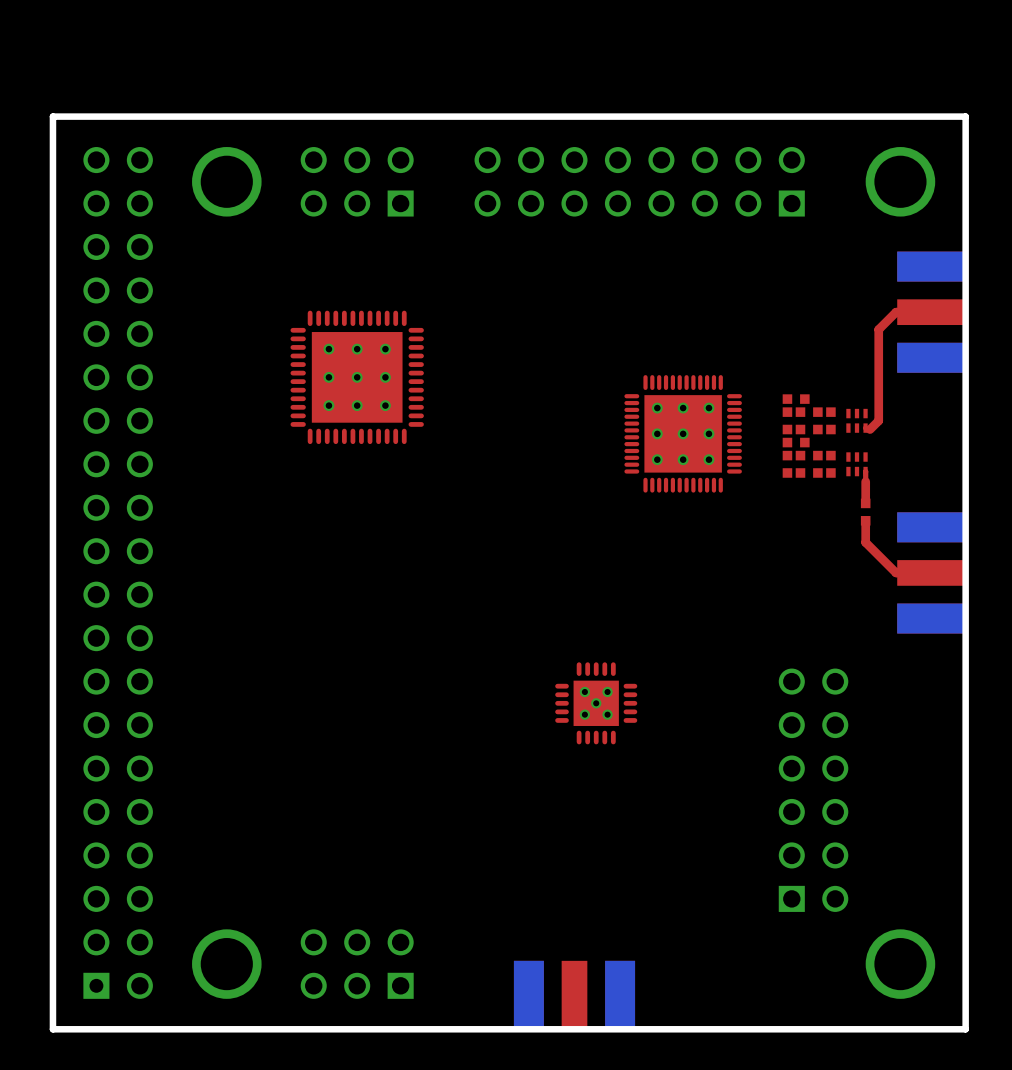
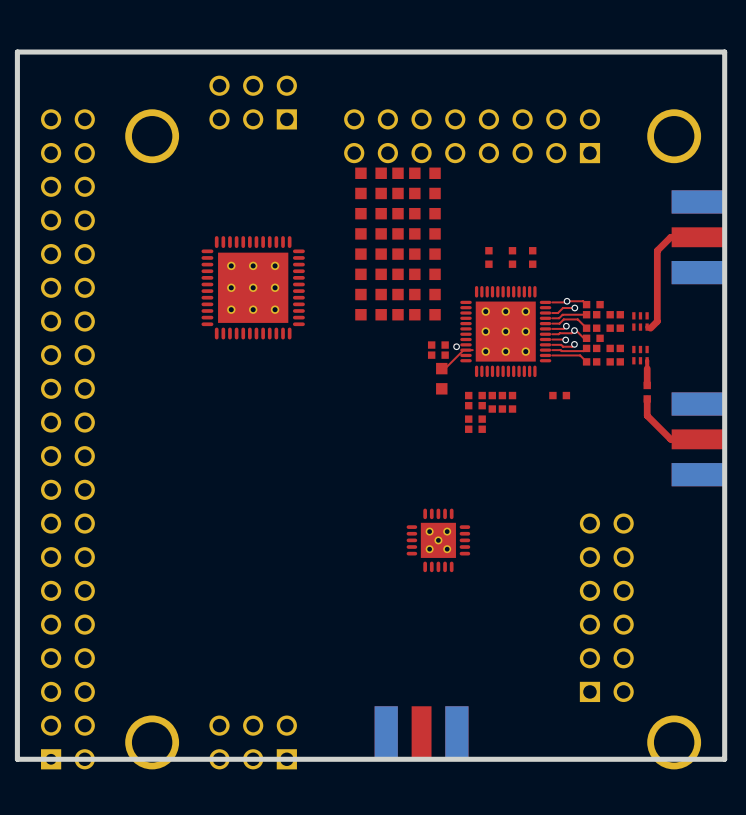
board edge: (965, 116) (52, 116) -> (724, 85) (724, 52) (17, 52) (17, 85)
part position: (357, 181) -> (253, 102)
part: none -> (371, 173)
part: none -> (424, 173)
part: none -> (397, 183)
part: none -> (371, 193)
part: none -> (424, 193)
part: none -> (371, 213)
part: none -> (424, 213)
part: none -> (397, 223)
part: none -> (371, 233)
part: none -> (424, 233)
part: none -> (371, 254)
part: none -> (424, 254)
part: none -> (488, 257)
part: none -> (512, 257)
part: none -> (532, 257)
part: none -> (397, 264)
part: none -> (371, 274)
part: none -> (424, 274)
part: none -> (371, 294)
part: none -> (424, 294)
via: none -> (567, 301)
top track: none -> (552, 302) (583, 301) (586, 304)
part: none -> (397, 304)
top track: none -> (574, 307) (563, 307) (558, 313) (552, 313)
via: none -> (574, 307)
part: none -> (371, 314)
part: none -> (424, 314)
top track: none -> (586, 314) (562, 314) (559, 318) (552, 318)
top track: none -> (552, 323) (559, 323) (563, 319) (577, 319) (586, 328)
top track: none -> (566, 326) (563, 328) (552, 328)
via: none -> (566, 326)
via: none -> (574, 330)
top track: none -> (552, 334) (571, 333) (576, 330) (583, 338) (586, 338)
top track: none -> (552, 339) (565, 339)
via: none -> (565, 339)
top track: none -> (574, 344) (572, 346) (552, 344)
via: none -> (574, 344)
part: none -> (438, 345)
via: none -> (456, 346)
top track: none -> (586, 348) (583, 351) (552, 350)
top track: none -> (472, 350) (463, 350) (445, 368) (441, 368)
part: none -> (438, 355)
top track: none -> (552, 355) (580, 355) (586, 361)
part: none -> (441, 378)
part: none -> (475, 395)
part: none -> (559, 395)
part: none -> (492, 402)
part: none -> (502, 402)
part: none -> (512, 402)
part: none -> (468, 412)
part: none -> (482, 412)
part: none -> (475, 429)
board edge: (965, 985) (965, 1029) (52, 1029) (52, 985) -> (724, 759) (17, 759)
part position: (574, 995) -> (421, 732)

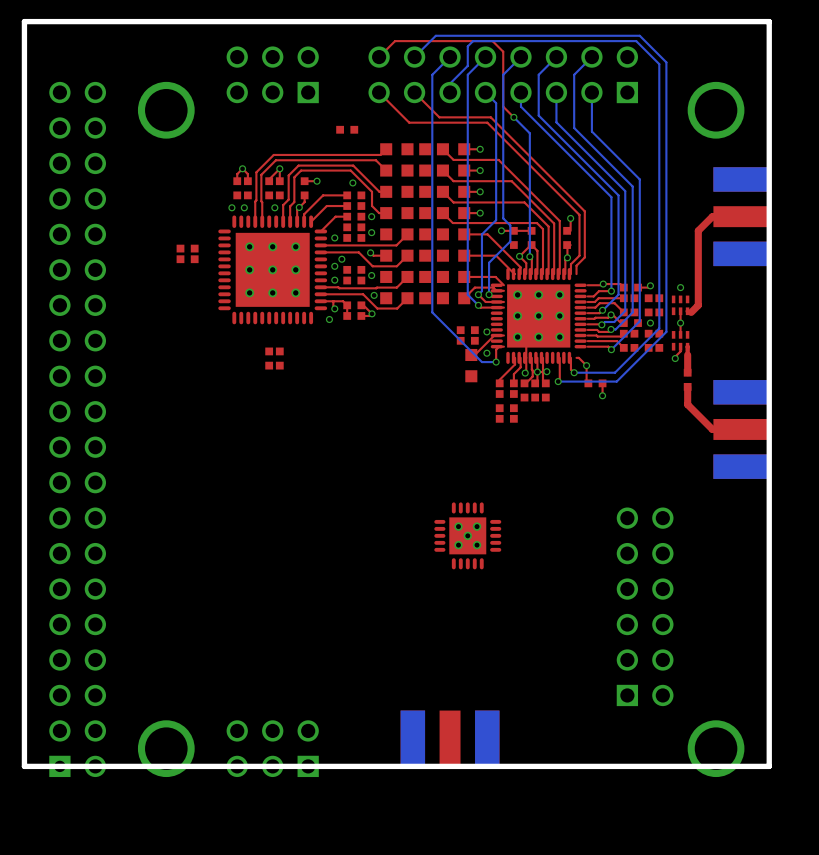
top track: none -> (379, 57) (395, 41) (492, 41) (503, 51) (503, 106) (513, 117)
bottom track: none -> (414, 57) (435, 35) (639, 35) (666, 62) (666, 331) (616, 381) (558, 381)
bottom track: none -> (450, 57) (432, 74) (432, 312) (481, 362) (496, 362)
bottom track: none -> (485, 57) (467, 74) (467, 294) (478, 305)
bottom track: none -> (520, 57) (503, 74) (503, 218) (510, 225) (510, 241) (489, 262) (489, 294)
bottom track: none -> (556, 57) (538, 74) (538, 115) (618, 195) (618, 294) (602, 310)
bottom track: none -> (591, 57) (574, 74) (574, 127) (632, 186) (632, 312) (615, 329) (611, 329)
top track: none -> (379, 92) (409, 122) (487, 122) (579, 214) (579, 255) (570, 264) (570, 274)
top track: none -> (414, 92) (439, 117) (490, 117) (584, 211) (584, 257) (576, 265) (576, 274)
bottom track: none -> (450, 92) (450, 83) (467, 65) (467, 46) (473, 41) (636, 41) (659, 64) (659, 328) (614, 372) (574, 372)
bottom track: none -> (485, 92) (496, 103) (496, 220) (481, 234) (481, 291) (478, 294)
bottom track: none -> (520, 92) (520, 106) (611, 197) (611, 291)
bottom track: none -> (556, 92) (556, 122) (625, 191) (625, 311) (614, 322) (605, 322) (601, 324)
bottom track: none -> (591, 92) (591, 131) (639, 179) (639, 321) (611, 349)
part position: (472, 136) -> (503, 74)
bottom track: none -> (513, 117) (529, 133) (529, 256)
via: none -> (513, 117)
part: none -> (347, 129)
top track: none -> (386, 149) (380, 154) (273, 154) (256, 172) (255, 221)
top track: none -> (442, 149) (453, 159) (498, 159) (559, 221) (559, 274)
top track: none -> (480, 149) (464, 149)
via: none -> (480, 149)
via: none -> (242, 168)
via: none -> (279, 168)
top track: none -> (386, 170) (375, 160) (275, 160) (261, 174) (262, 221)
top track: none -> (442, 170) (453, 181) (511, 181) (554, 223) (554, 274)
top track: none -> (480, 170) (464, 170)
via: none -> (480, 170)
top track: none -> (247, 181) (247, 174) (242, 168) (237, 174) (237, 181)
top track: none -> (279, 181) (279, 168) (269, 181)
top track: none -> (317, 181) (304, 181)
via: none -> (317, 181)
via: none -> (352, 182)
part: none -> (237, 188)
part: none -> (247, 188)
part: none -> (269, 188)
part: none -> (279, 188)
part: none -> (304, 188)
top track: none -> (386, 191) (379, 191) (353, 165) (298, 165) (288, 175) (288, 199) (283, 205) (283, 221)
top track: none -> (442, 191) (453, 202) (524, 202) (548, 226) (548, 274)
top track: none -> (480, 191) (464, 191)
via: none -> (480, 191)
top track: none -> (304, 195) (304, 202) (297, 209) (297, 221)
top track: none -> (347, 195) (323, 195) (304, 214) (304, 221)
part: none -> (354, 195)
top track: none -> (347, 206) (326, 206) (311, 221)
part: none -> (354, 206)
via: none -> (231, 207)
via: none -> (244, 207)
via: none -> (274, 207)
via: none -> (299, 207)
top track: none -> (386, 213) (379, 213) (372, 206) (372, 191) (350, 170) (301, 170) (294, 177) (294, 202) (290, 206) (290, 221)
top track: none -> (442, 213) (452, 223) (536, 223) (543, 229) (543, 274)
top track: none -> (480, 213) (464, 213)
via: none -> (480, 213)
top track: none -> (347, 216) (335, 216) (320, 231)
part: none -> (354, 216)
via: none -> (371, 216)
top track: none -> (570, 218) (570, 230)
via: none -> (570, 218)
part: none -> (354, 227)
via: none -> (501, 230)
top track: none -> (531, 230) (501, 230)
via: none -> (371, 232)
top track: none -> (407, 234) (396, 245) (320, 245)
top track: none -> (464, 234) (487, 234) (520, 267) (520, 274)
via: none -> (334, 237)
part: none -> (354, 237)
part: none -> (513, 237)
part: (488, 257) -> none
part: none -> (531, 237)
part: (512, 257) -> none
top track: none -> (570, 245) (567, 248) (565, 274)
part: none -> (187, 248)
top track: none -> (320, 252) (358, 252) (372, 266) (396, 266) (407, 255)
top track: none -> (370, 252) (373, 255) (386, 255)
via: none -> (370, 252)
top track: none -> (464, 255) (496, 255) (515, 274)
via: none -> (519, 256)
top track: none -> (529, 256) (531, 258) (531, 274)
via: none -> (529, 256)
via: none -> (567, 257)
part: none -> (187, 259)
via: none -> (341, 259)
via: none -> (334, 266)
part: none -> (354, 269)
top track: none -> (537, 274) (537, 250) (531, 245) (519, 256) (526, 263) (526, 274)
via: none -> (371, 275)
top track: none -> (407, 276) (396, 287) (320, 287)
top track: none -> (464, 276) (495, 276) (503, 285)
via: none -> (334, 280)
part: none -> (354, 280)
top track: none -> (650, 285) (648, 287) (638, 287)
via: none -> (650, 285)
via: none -> (680, 287)
top track: none -> (503, 290) (496, 290) (493, 287) (474, 287) (464, 298)
top track: none -> (320, 294) (363, 294) (377, 308) (397, 308) (407, 298)
top track: none -> (478, 294) (485, 301) (503, 301)
via: none -> (478, 294)
via: none -> (489, 294)
via: none -> (374, 295)
top track: none -> (320, 301) (343, 301) (347, 305) (347, 315)
top track: none -> (333, 301) (334, 308)
part: none -> (354, 305)
top track: none -> (361, 305) (372, 313) (369, 315) (361, 315)
top track: none -> (478, 305) (480, 307) (503, 307)
via: none -> (478, 305)
via: none -> (334, 308)
top track: none -> (680, 311) (680, 334)
via: none -> (372, 313)
part: none -> (354, 315)
via: none -> (329, 319)
via: none -> (650, 323)
via: none -> (680, 323)
top track: none -> (526, 335) (525, 373)
top track: none -> (503, 346) (499, 346) (496, 349) (496, 362)
top track: none -> (587, 346) (608, 346) (611, 349)
top track: none -> (680, 346) (680, 351) (675, 358)
via: none -> (611, 349)
via: none -> (486, 353)
part: none -> (269, 358)
part: none -> (279, 358)
top track: none -> (515, 357) (515, 364) (499, 379) (499, 383)
top track: none -> (520, 357) (520, 367) (513, 374) (513, 383)
top track: none -> (531, 357) (531, 369) (534, 372) (546, 371)
top track: none -> (537, 357) (537, 381) (535, 383)
top track: none -> (543, 357) (543, 380) (545, 383)
top track: none -> (559, 357) (558, 381)
top track: none -> (570, 357) (570, 369) (574, 372)
top track: none -> (576, 357) (586, 365) (586, 381) (588, 383)
via: none -> (675, 358)
via: none -> (496, 362)
via: none -> (586, 365)
top track: none -> (532, 370) (532, 376) (524, 383)
via: none -> (537, 372)
via: none -> (546, 371)
via: none -> (525, 373)
via: none -> (574, 372)
via: none -> (558, 381)
top track: none -> (602, 383) (602, 395)
via: none -> (602, 395)

